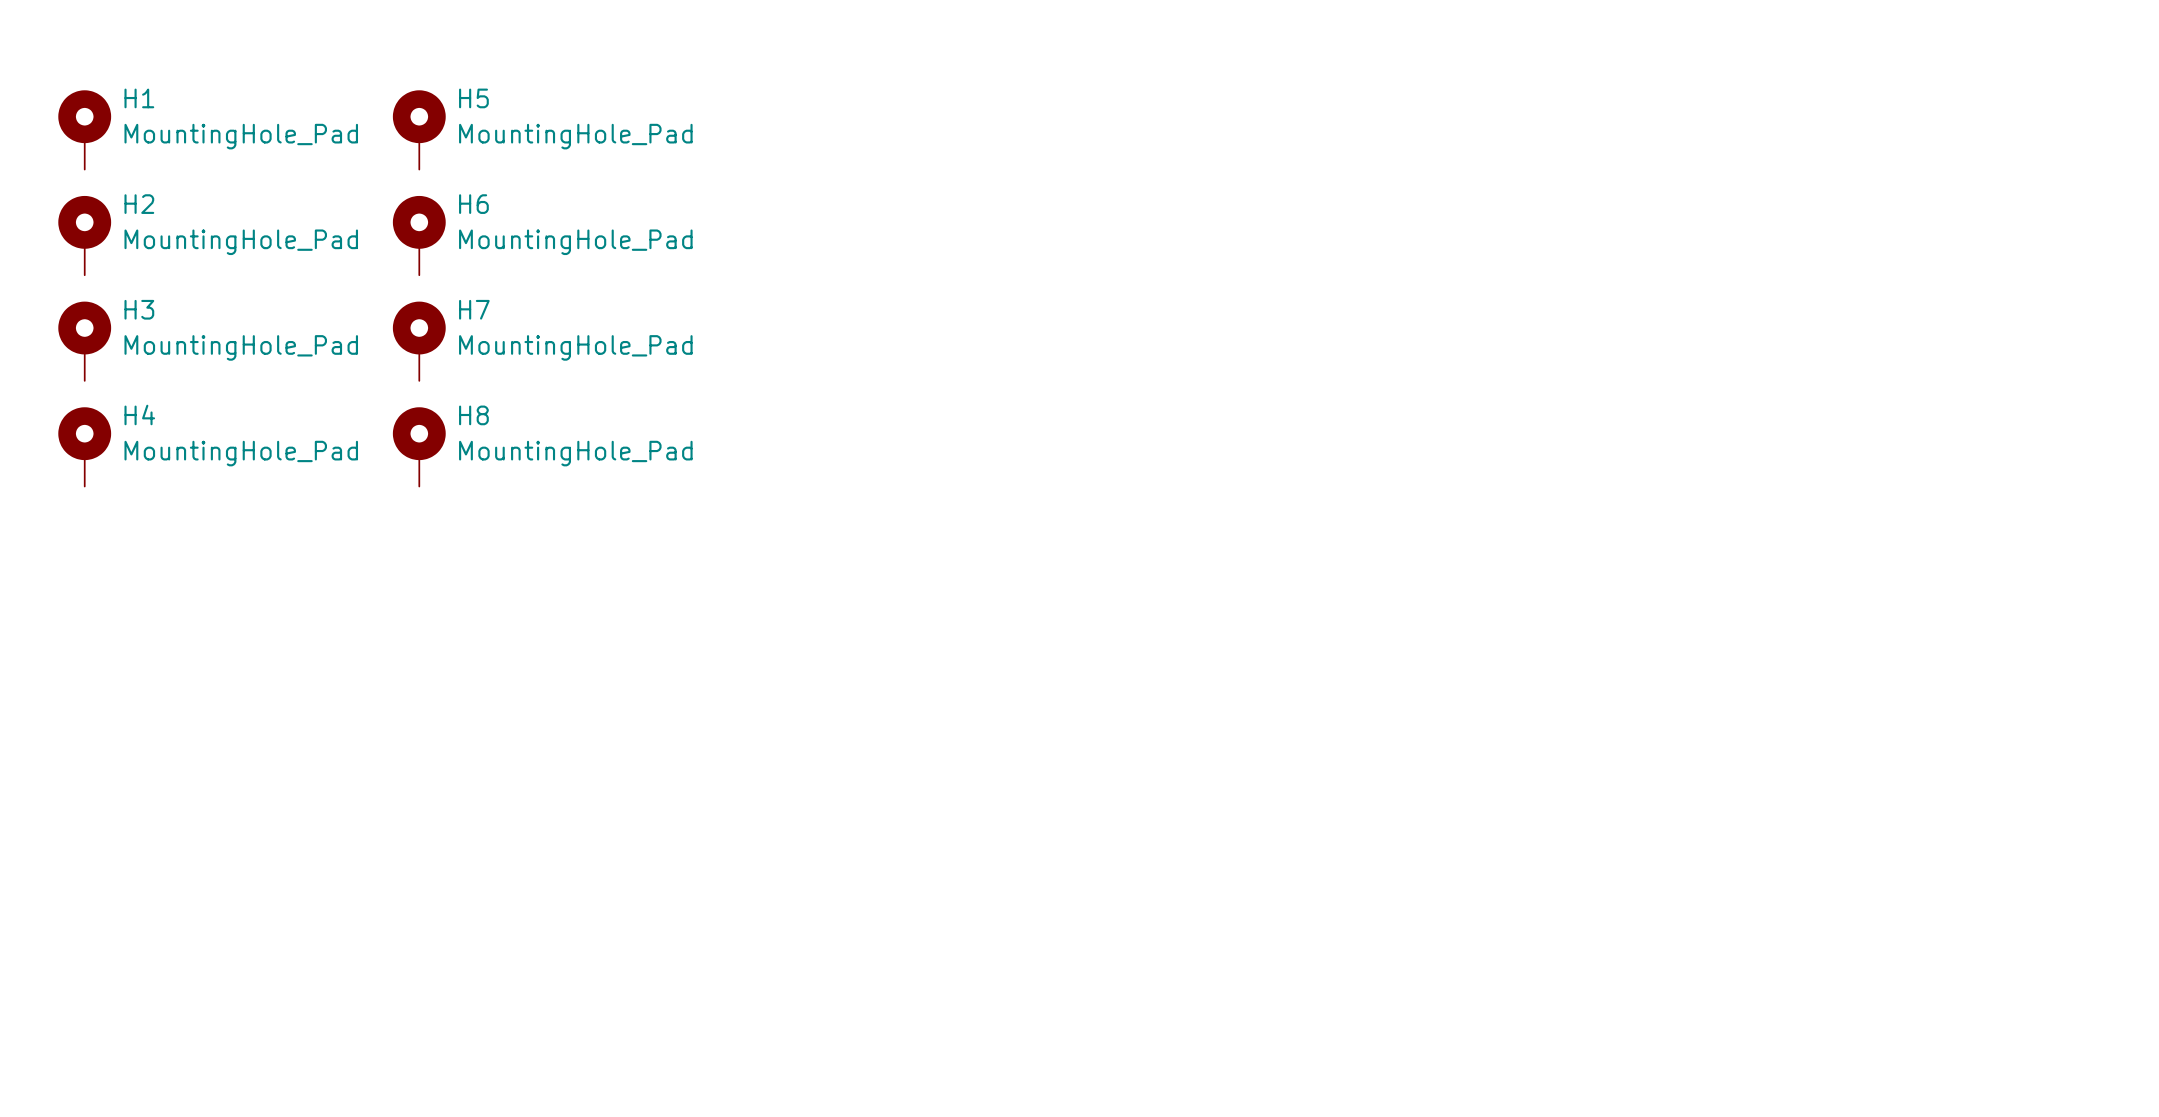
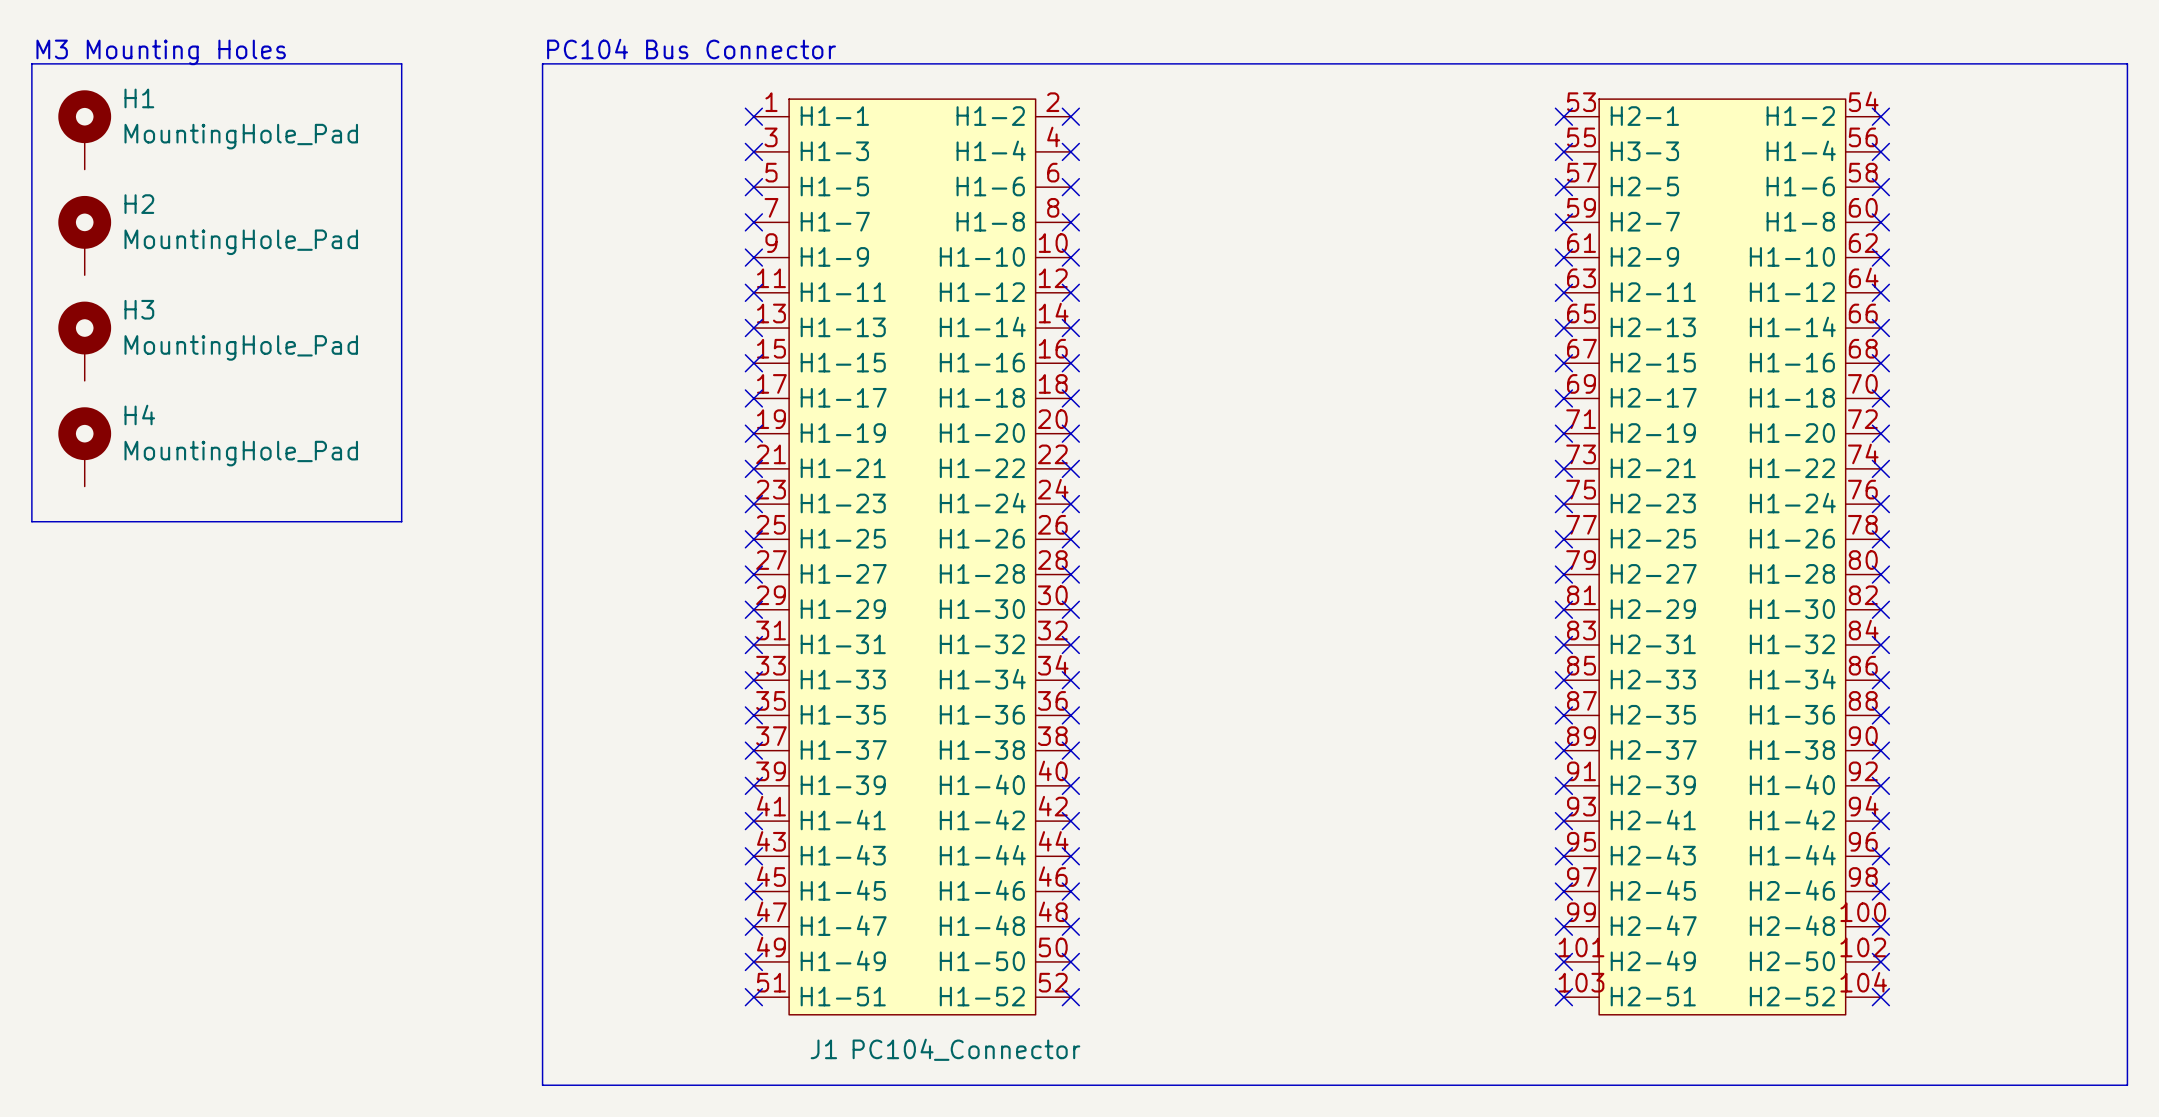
text: none -> PC104 Bus Connector (691, 49)
text: none -> M3 Mounting Holes (161, 52)
line: none -> (31, 63) (31, 521) (401, 521) (401, 63) (31, 63)
line: none -> (542, 63) (542, 1085) (2127, 1085) (2127, 63) (542, 63)
no-connect mark: none -> (753, 116)
no-connect mark: none -> (1070, 116)
no-connect mark: none -> (1563, 116)
no-connect mark: none -> (1880, 116)
H5: MountingHole_Pad (419, 129) -> none
no-connect mark: none -> (753, 151)
no-connect mark: none -> (1070, 151)
no-connect mark: none -> (1563, 151)
no-connect mark: none -> (1880, 151)
no-connect mark: none -> (753, 187)
no-connect mark: none -> (1070, 187)
no-connect mark: none -> (1563, 187)
no-connect mark: none -> (1880, 187)
no-connect mark: none -> (753, 222)
no-connect mark: none -> (1070, 222)
no-connect mark: none -> (1563, 222)
no-connect mark: none -> (1880, 222)
H6: MountingHole_Pad (419, 235) -> none
no-connect mark: none -> (753, 257)
no-connect mark: none -> (1070, 257)
no-connect mark: none -> (1563, 257)
no-connect mark: none -> (1880, 257)
no-connect mark: none -> (753, 292)
no-connect mark: none -> (1070, 292)
no-connect mark: none -> (1563, 292)
no-connect mark: none -> (1880, 292)
no-connect mark: none -> (753, 328)
no-connect mark: none -> (1070, 328)
no-connect mark: none -> (1563, 328)
no-connect mark: none -> (1880, 328)
H7: MountingHole_Pad (419, 341) -> none
no-connect mark: none -> (753, 363)
no-connect mark: none -> (1070, 363)
no-connect mark: none -> (1563, 363)
no-connect mark: none -> (1880, 363)
no-connect mark: none -> (753, 398)
no-connect mark: none -> (1070, 398)
no-connect mark: none -> (1563, 398)
no-connect mark: none -> (1880, 398)
no-connect mark: none -> (753, 433)
no-connect mark: none -> (1070, 433)
no-connect mark: none -> (1563, 433)
no-connect mark: none -> (1880, 433)
H8: MountingHole_Pad (419, 446) -> none
no-connect mark: none -> (753, 468)
no-connect mark: none -> (1070, 468)
no-connect mark: none -> (1563, 468)
no-connect mark: none -> (1880, 468)
no-connect mark: none -> (753, 504)
no-connect mark: none -> (1070, 504)
no-connect mark: none -> (1563, 504)
no-connect mark: none -> (1880, 504)
no-connect mark: none -> (753, 539)
no-connect mark: none -> (1070, 539)
no-connect mark: none -> (1563, 539)
no-connect mark: none -> (1880, 539)
J1: none -> PC104_Connector (1317, 556)
no-connect mark: none -> (753, 574)
no-connect mark: none -> (1070, 574)
no-connect mark: none -> (1563, 574)
no-connect mark: none -> (1880, 574)
no-connect mark: none -> (753, 609)
no-connect mark: none -> (1070, 609)
no-connect mark: none -> (1563, 609)
no-connect mark: none -> (1880, 609)
no-connect mark: none -> (753, 644)
no-connect mark: none -> (1070, 644)
no-connect mark: none -> (1563, 644)
no-connect mark: none -> (1880, 644)
no-connect mark: none -> (753, 680)
no-connect mark: none -> (1070, 680)
no-connect mark: none -> (1563, 680)
no-connect mark: none -> (1880, 680)
no-connect mark: none -> (753, 715)
no-connect mark: none -> (1070, 715)
no-connect mark: none -> (1563, 715)
no-connect mark: none -> (1880, 715)
no-connect mark: none -> (753, 750)
no-connect mark: none -> (1070, 750)
no-connect mark: none -> (1563, 750)
no-connect mark: none -> (1880, 750)
no-connect mark: none -> (753, 785)
no-connect mark: none -> (1070, 785)
no-connect mark: none -> (1563, 785)
no-connect mark: none -> (1880, 785)
no-connect mark: none -> (753, 821)
no-connect mark: none -> (1070, 821)
no-connect mark: none -> (1563, 821)
no-connect mark: none -> (1880, 821)
no-connect mark: none -> (753, 856)
no-connect mark: none -> (1070, 856)
no-connect mark: none -> (1563, 856)
no-connect mark: none -> (1880, 856)
no-connect mark: none -> (753, 891)
no-connect mark: none -> (1070, 891)
no-connect mark: none -> (1563, 891)
no-connect mark: none -> (1880, 891)
no-connect mark: none -> (753, 926)
no-connect mark: none -> (1070, 926)
no-connect mark: none -> (1563, 926)
no-connect mark: none -> (1880, 926)
no-connect mark: none -> (753, 961)
no-connect mark: none -> (1070, 961)
no-connect mark: none -> (1563, 961)
no-connect mark: none -> (1880, 961)
no-connect mark: none -> (753, 997)
no-connect mark: none -> (1070, 997)
no-connect mark: none -> (1563, 997)
no-connect mark: none -> (1880, 997)

